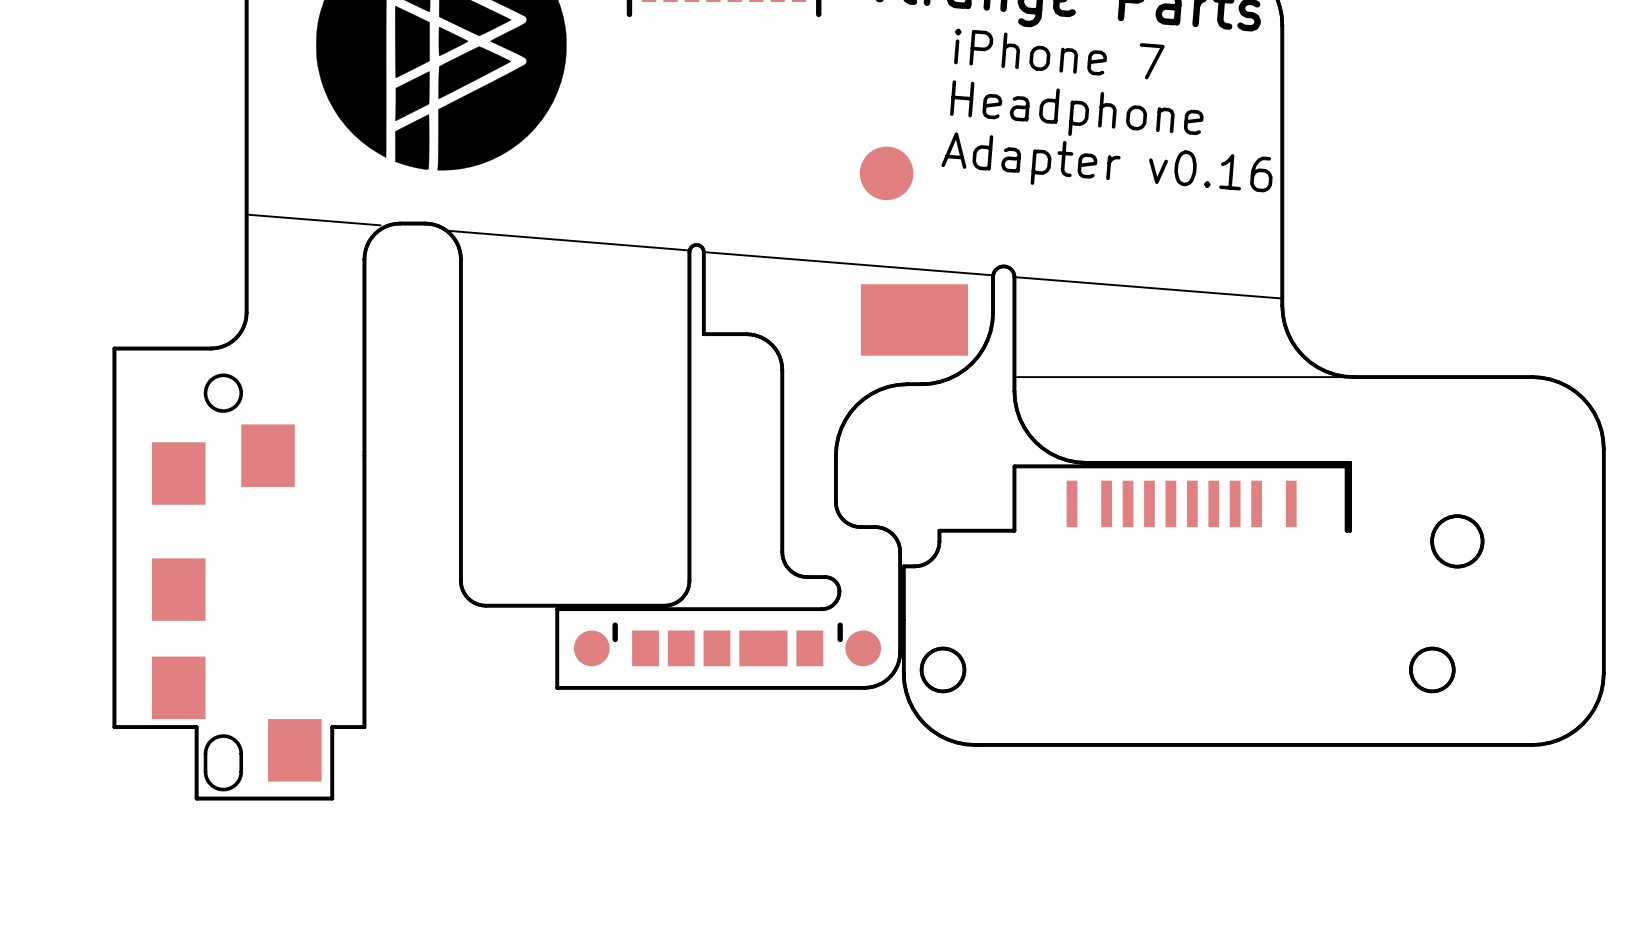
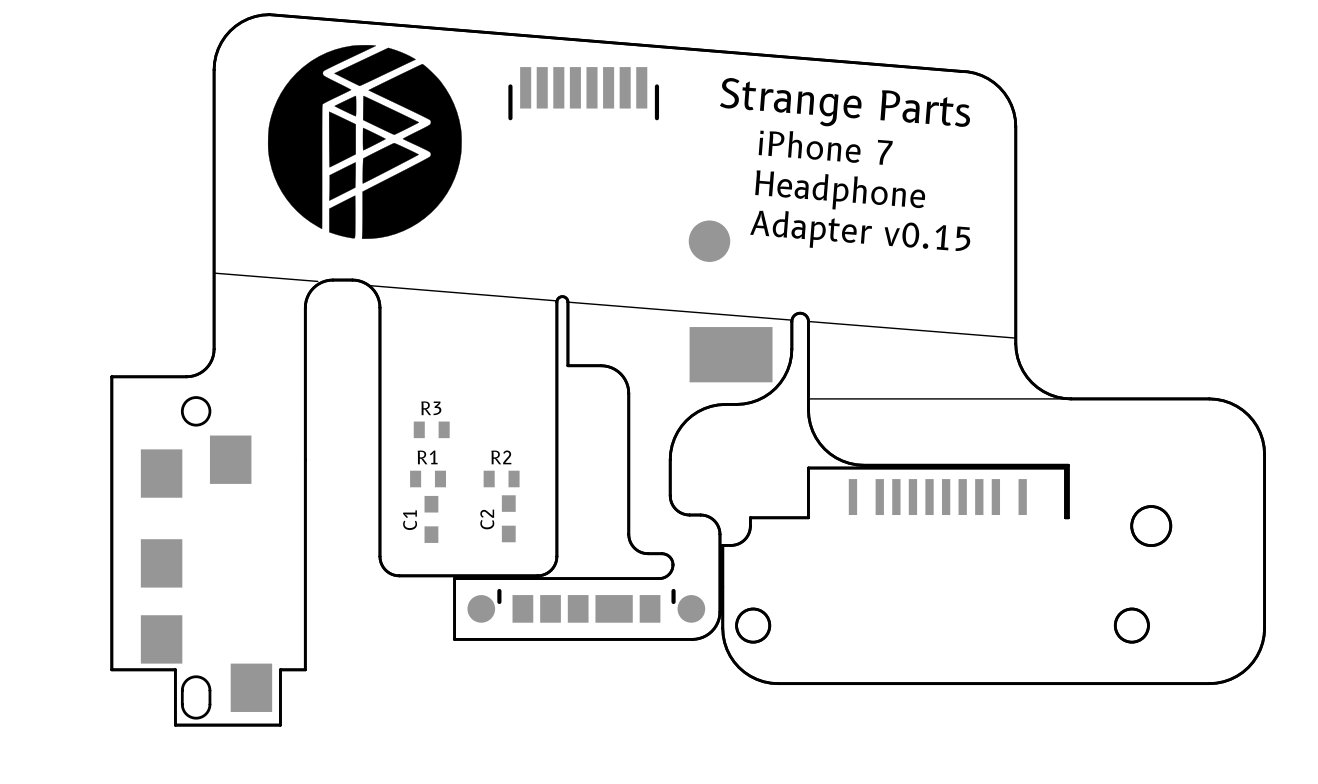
text: Adapter v0.16 (1107, 162) -> Adapter v0.15 (860, 230)
R3: none -> (431, 429)
R1: none -> (428, 478)
R2: none -> (501, 478)
C2: none -> (508, 518)
C1: none -> (431, 519)

